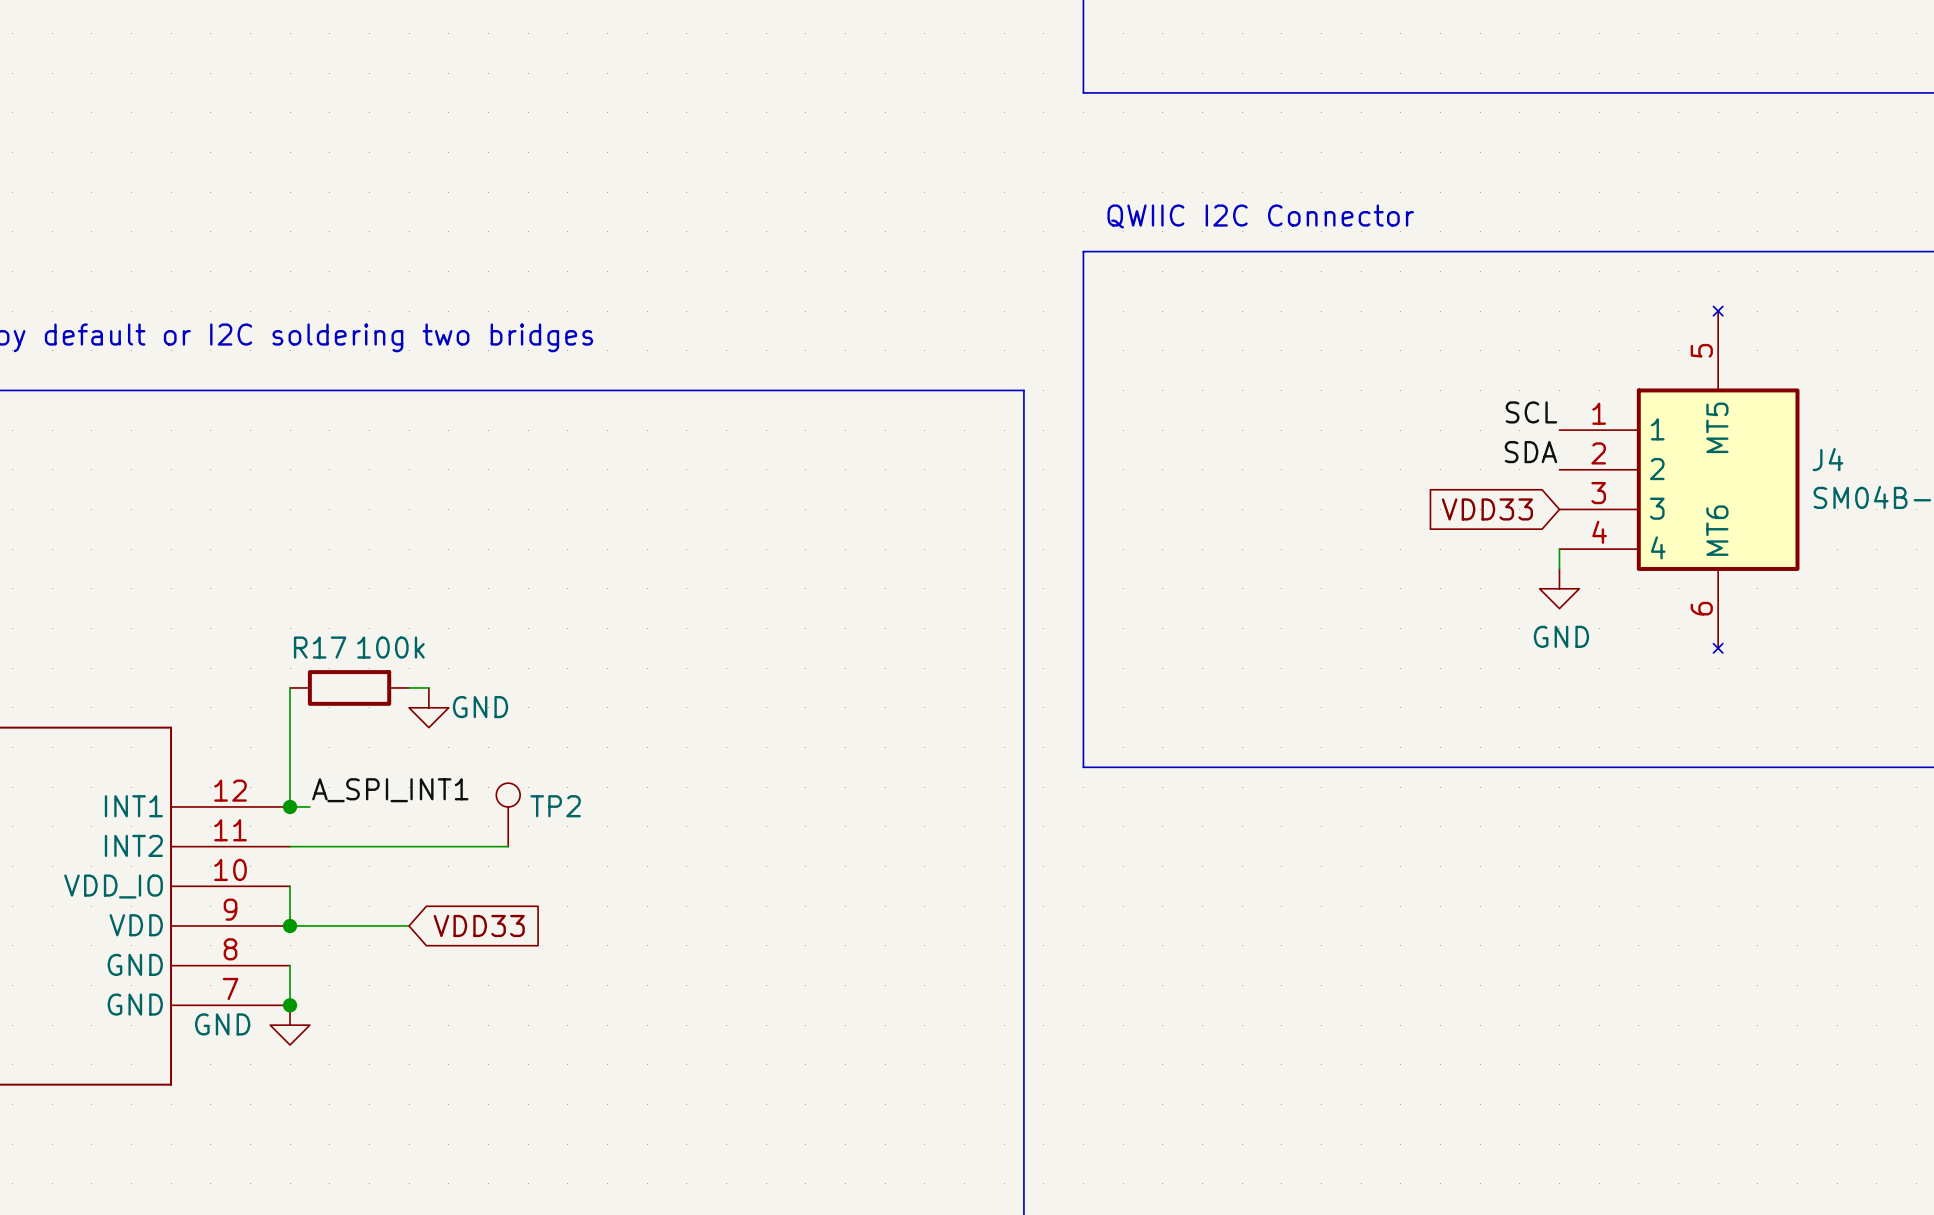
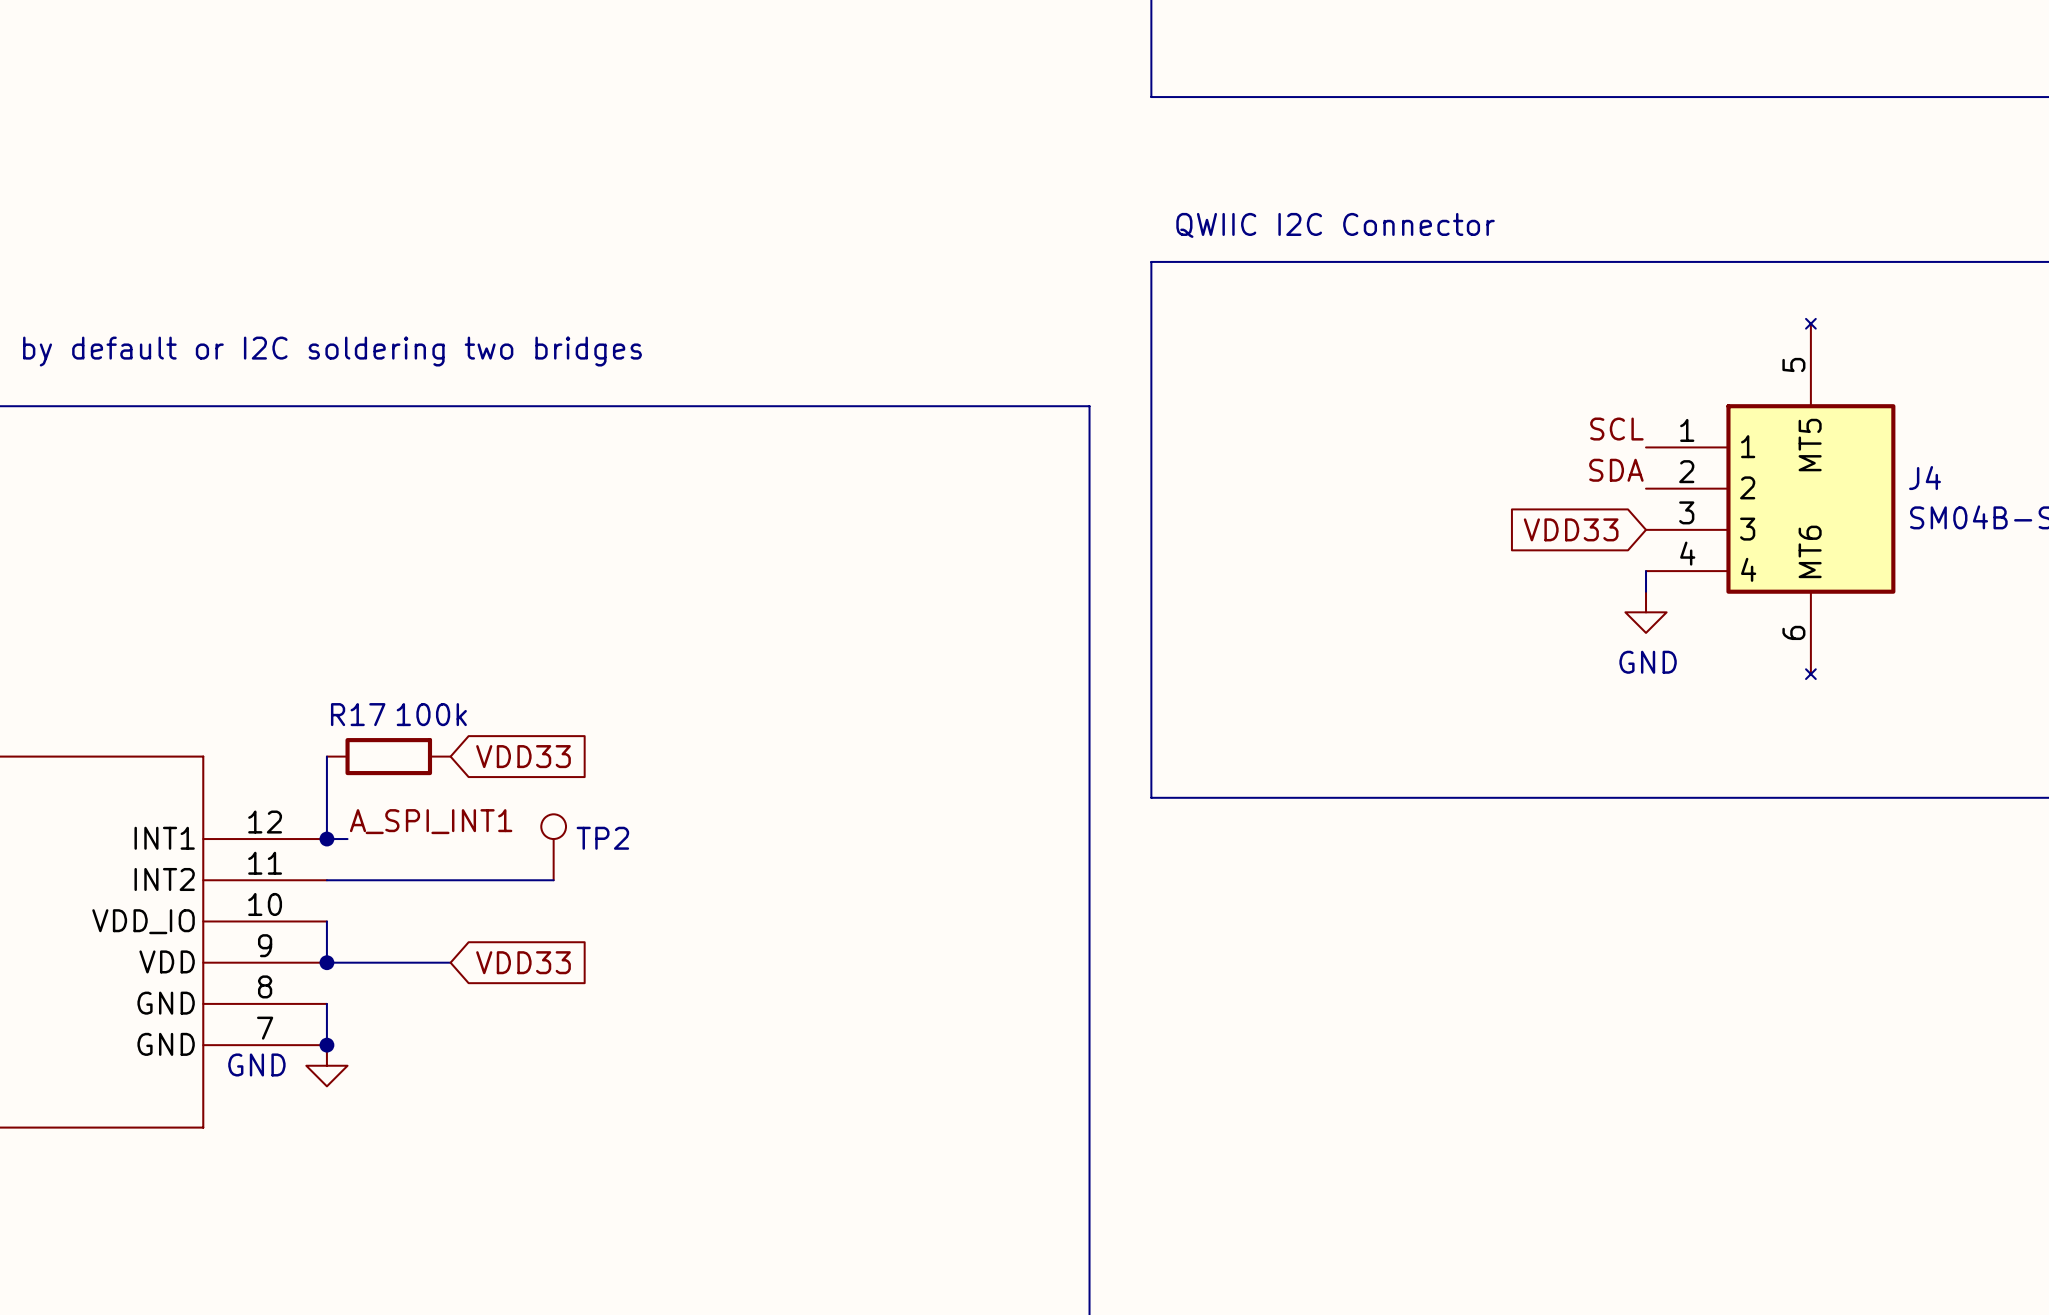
wire: (290, 687) (290, 727) -> none
R17 position: (349, 687) -> (388, 756)
wire: (409, 687) (428, 687) -> none
power symbol: GND (428, 707) -> none
global label: none -> VDD33 (523, 756)

